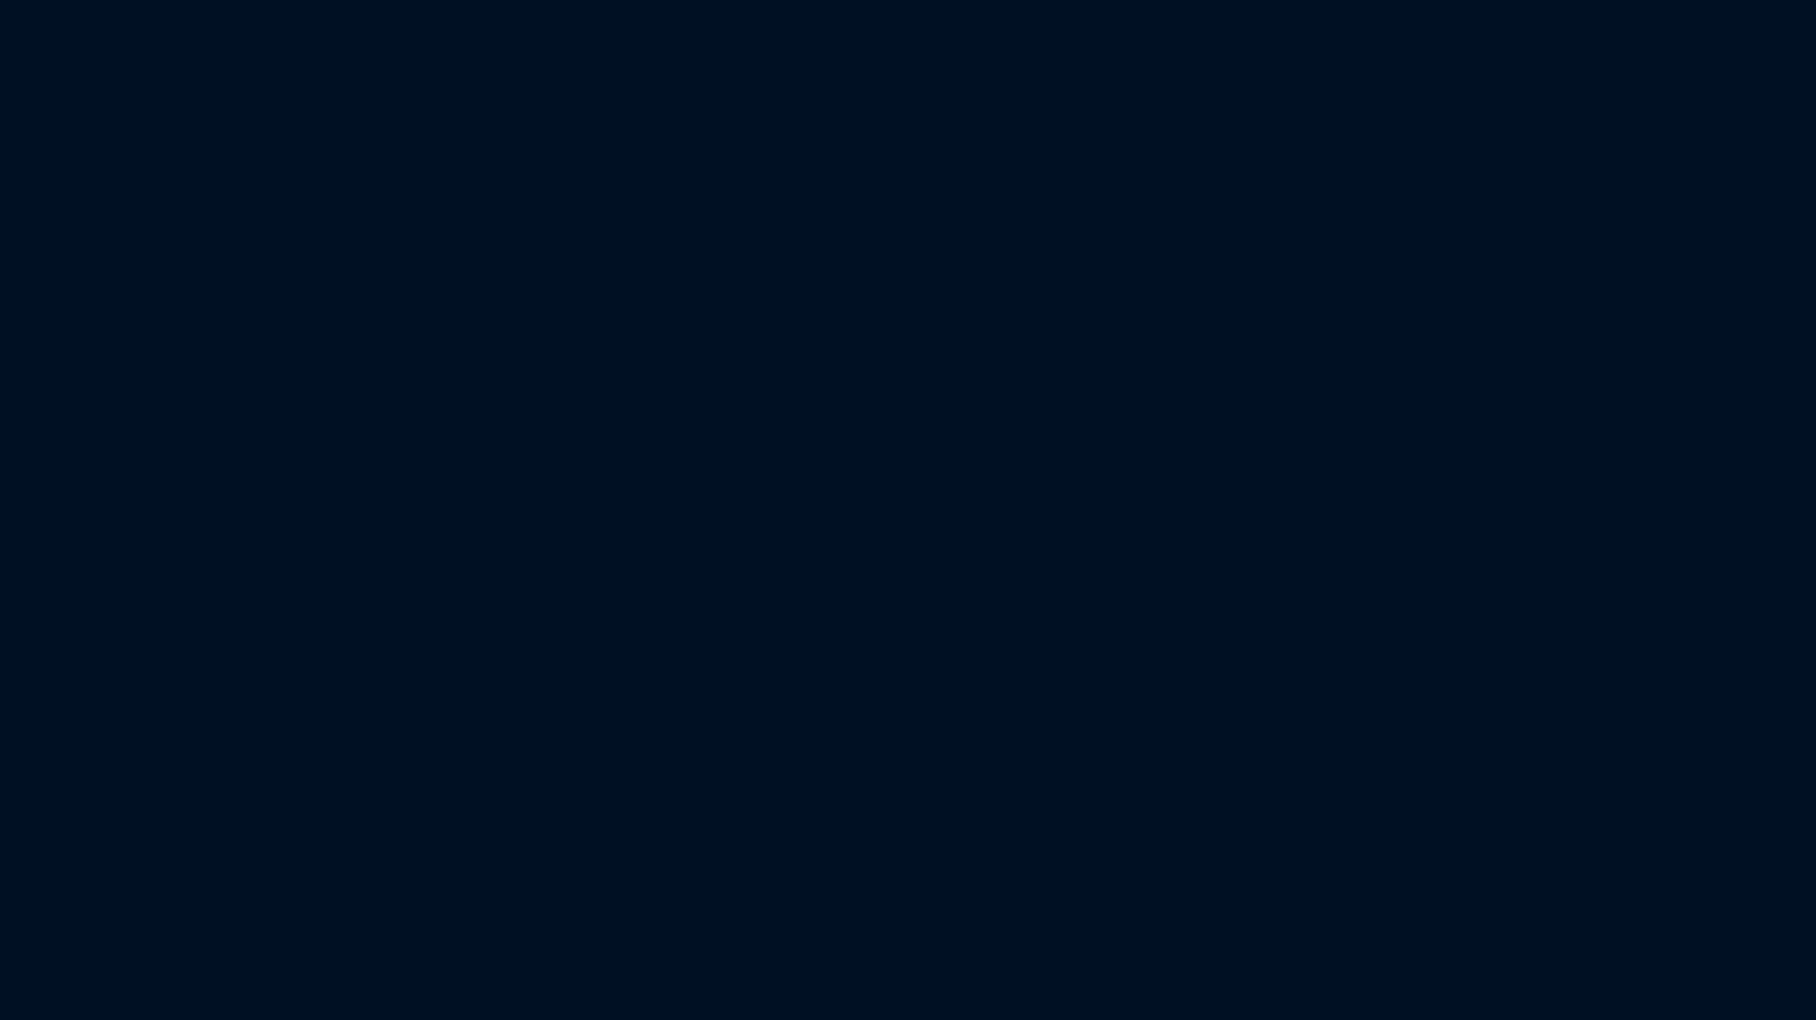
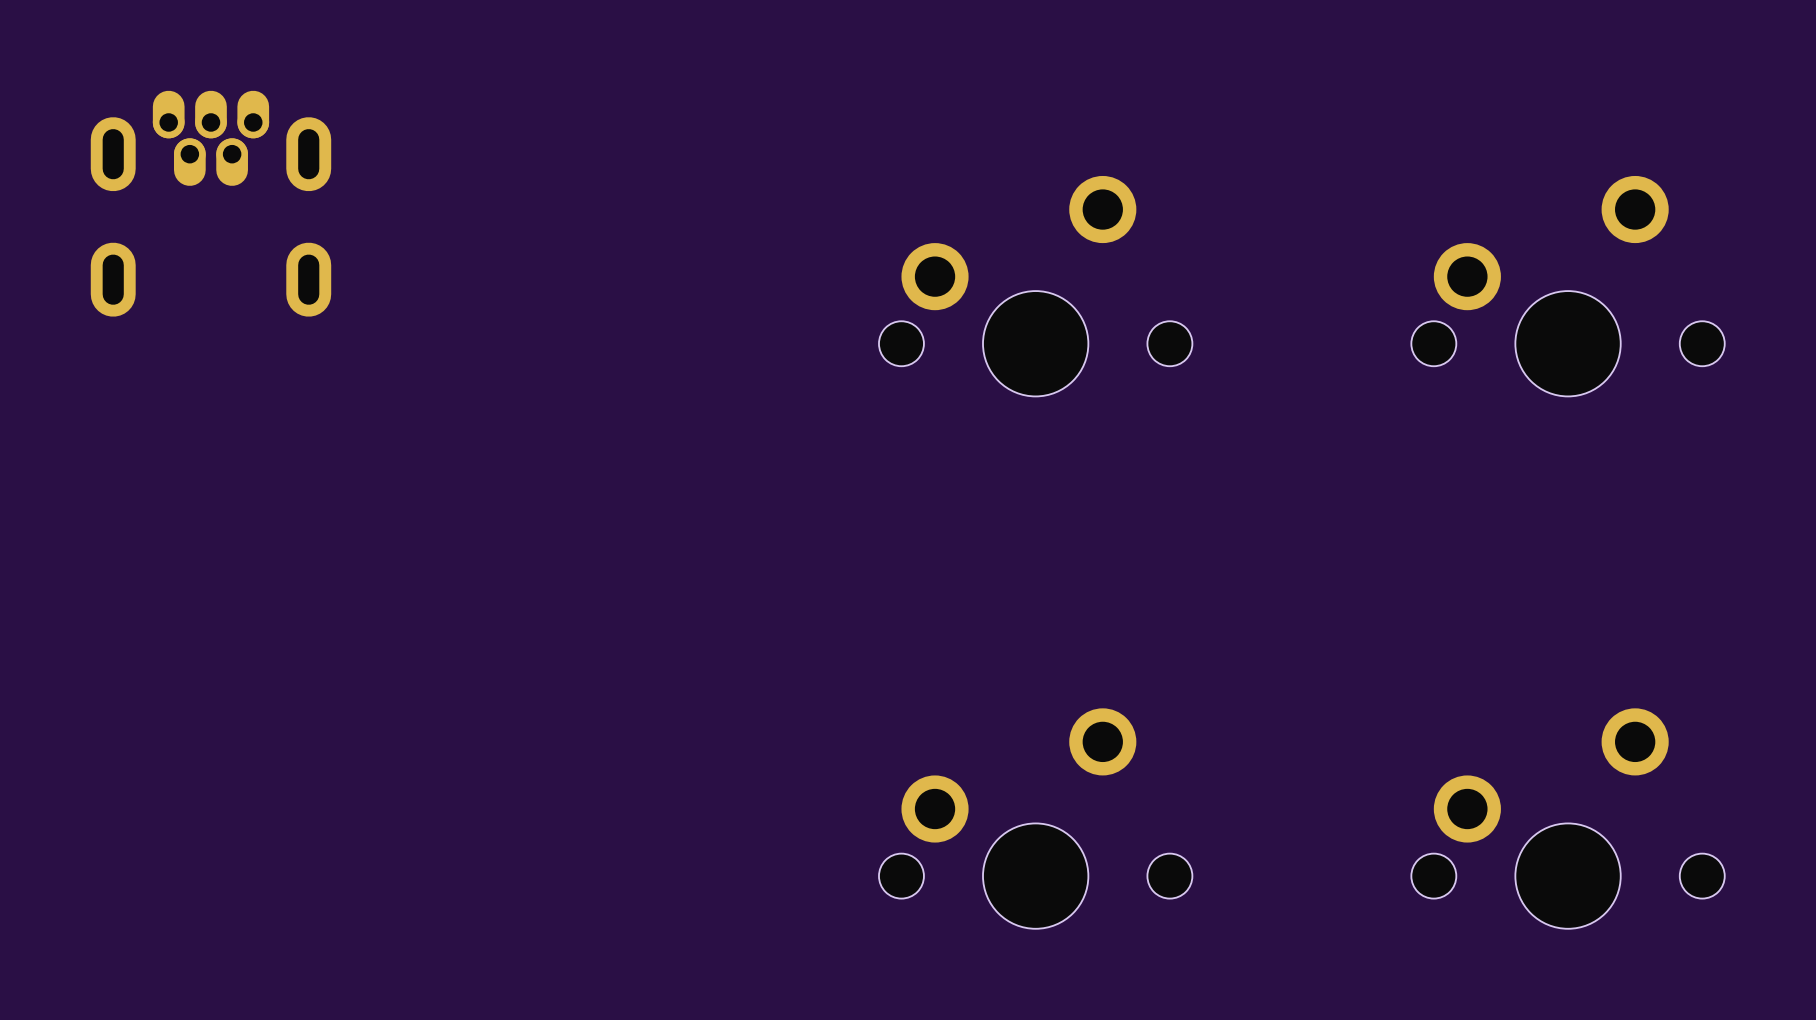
part: none -> (210, 203)
part: none -> (1035, 286)
part: none -> (1568, 286)
part: none -> (1035, 818)
part: none -> (1568, 818)

